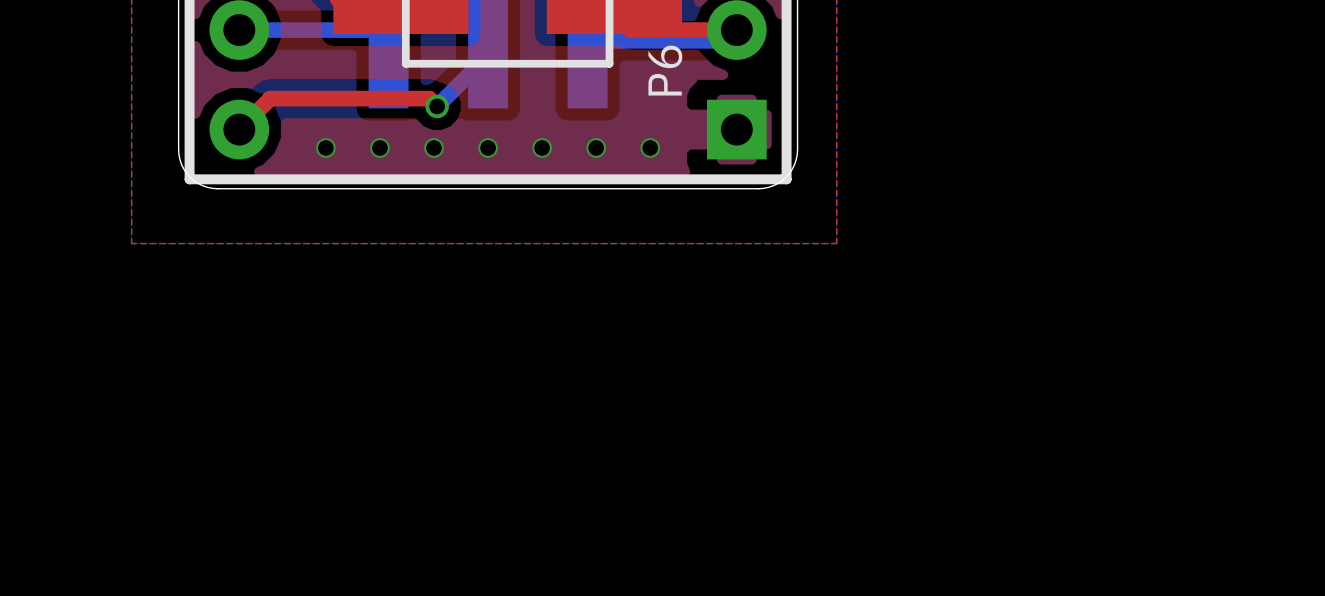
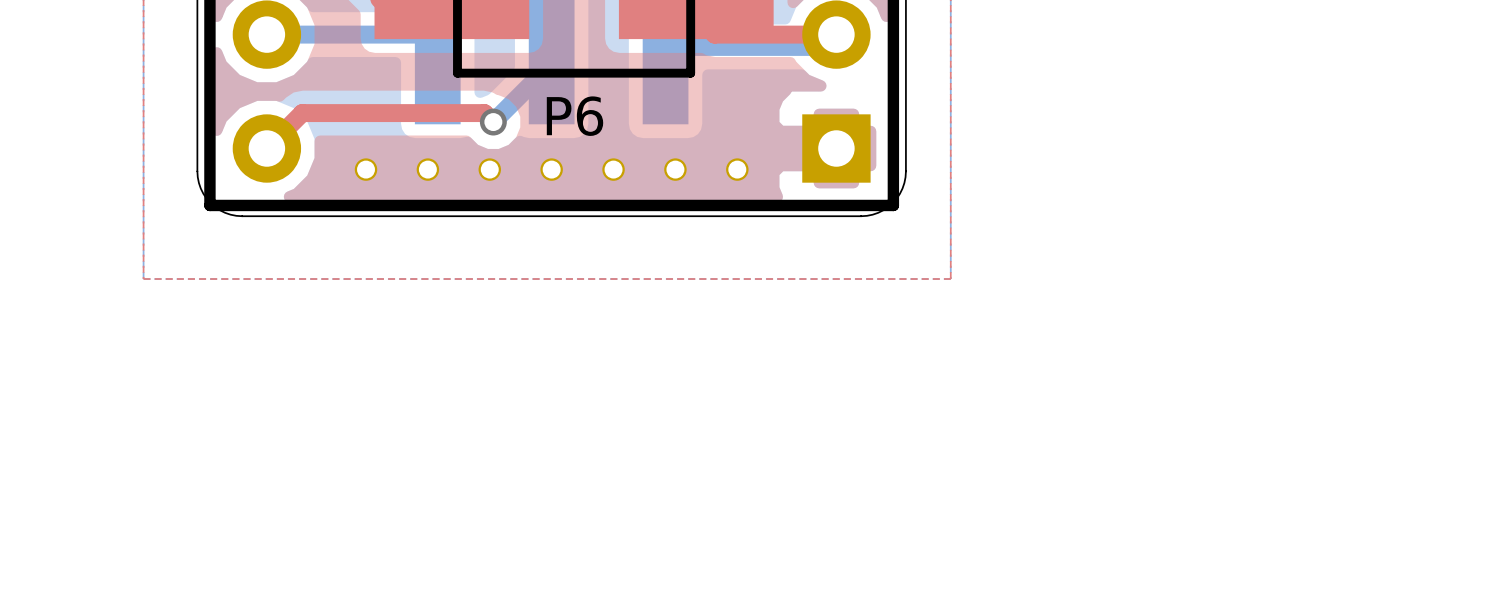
P6 name rotation: 0° (665, 70) -> 90° clockwise (575, 116)
P6 name position: P6 (665, 70) -> P6 (575, 116)

